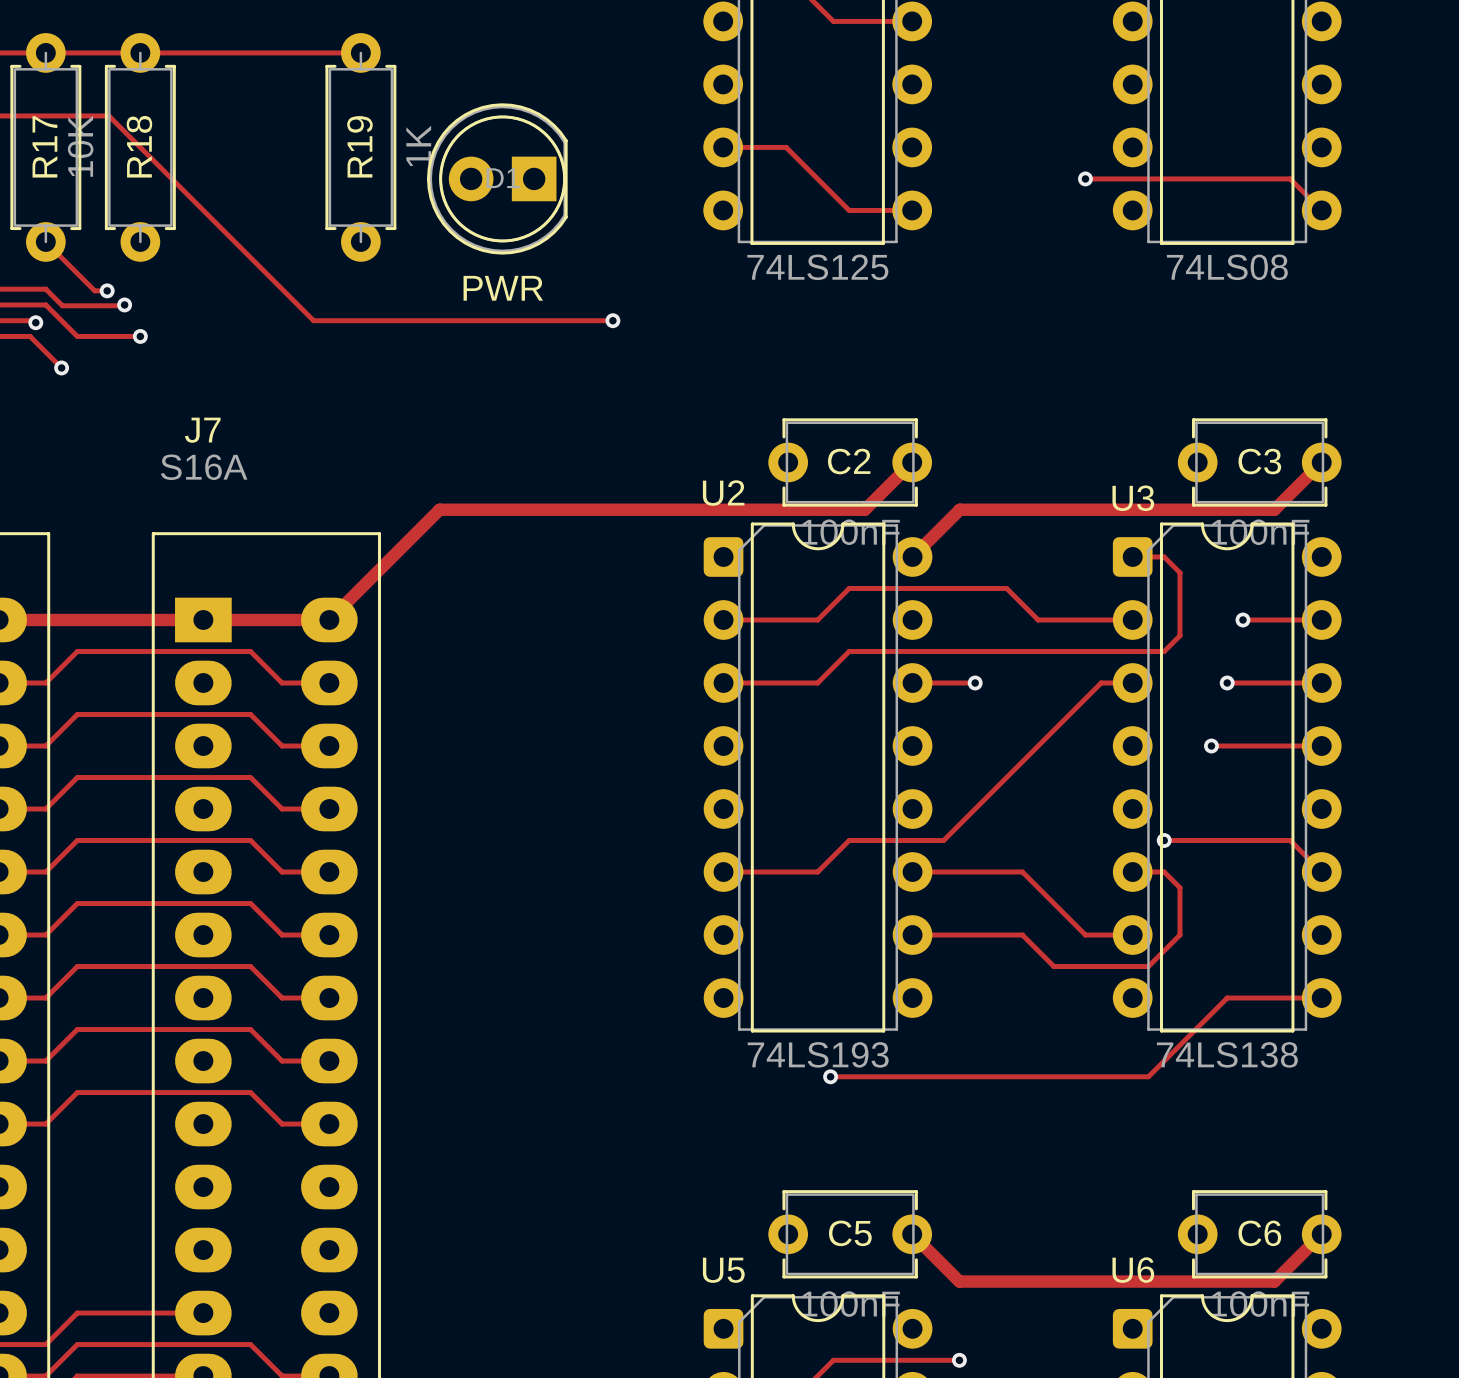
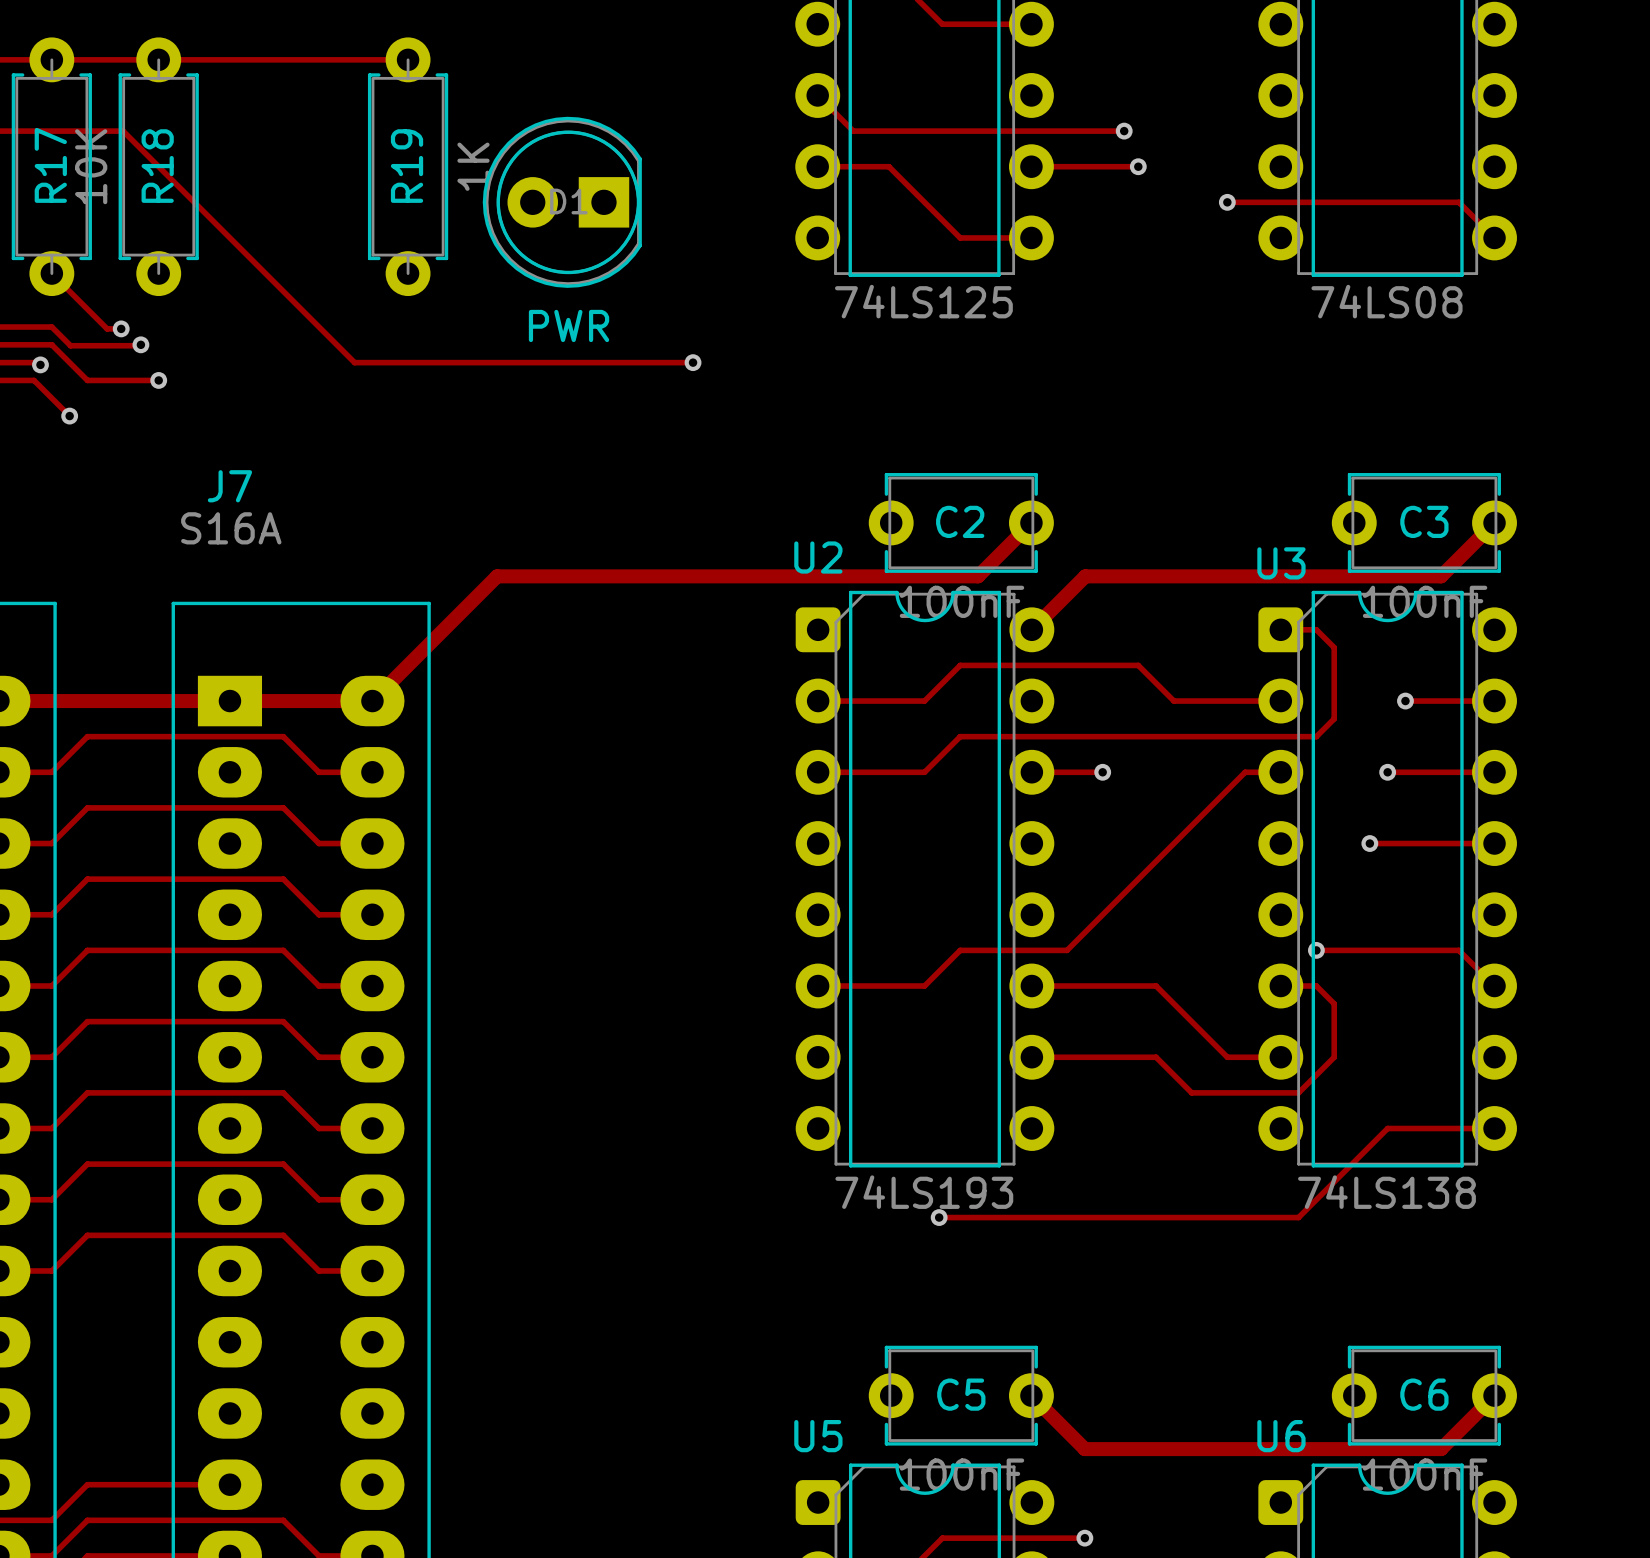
track: none -> (817, 95) (853, 131) (1124, 131)
via: none -> (1124, 131)
track: none -> (1031, 166) (1138, 166)
via: none -> (1138, 166)

